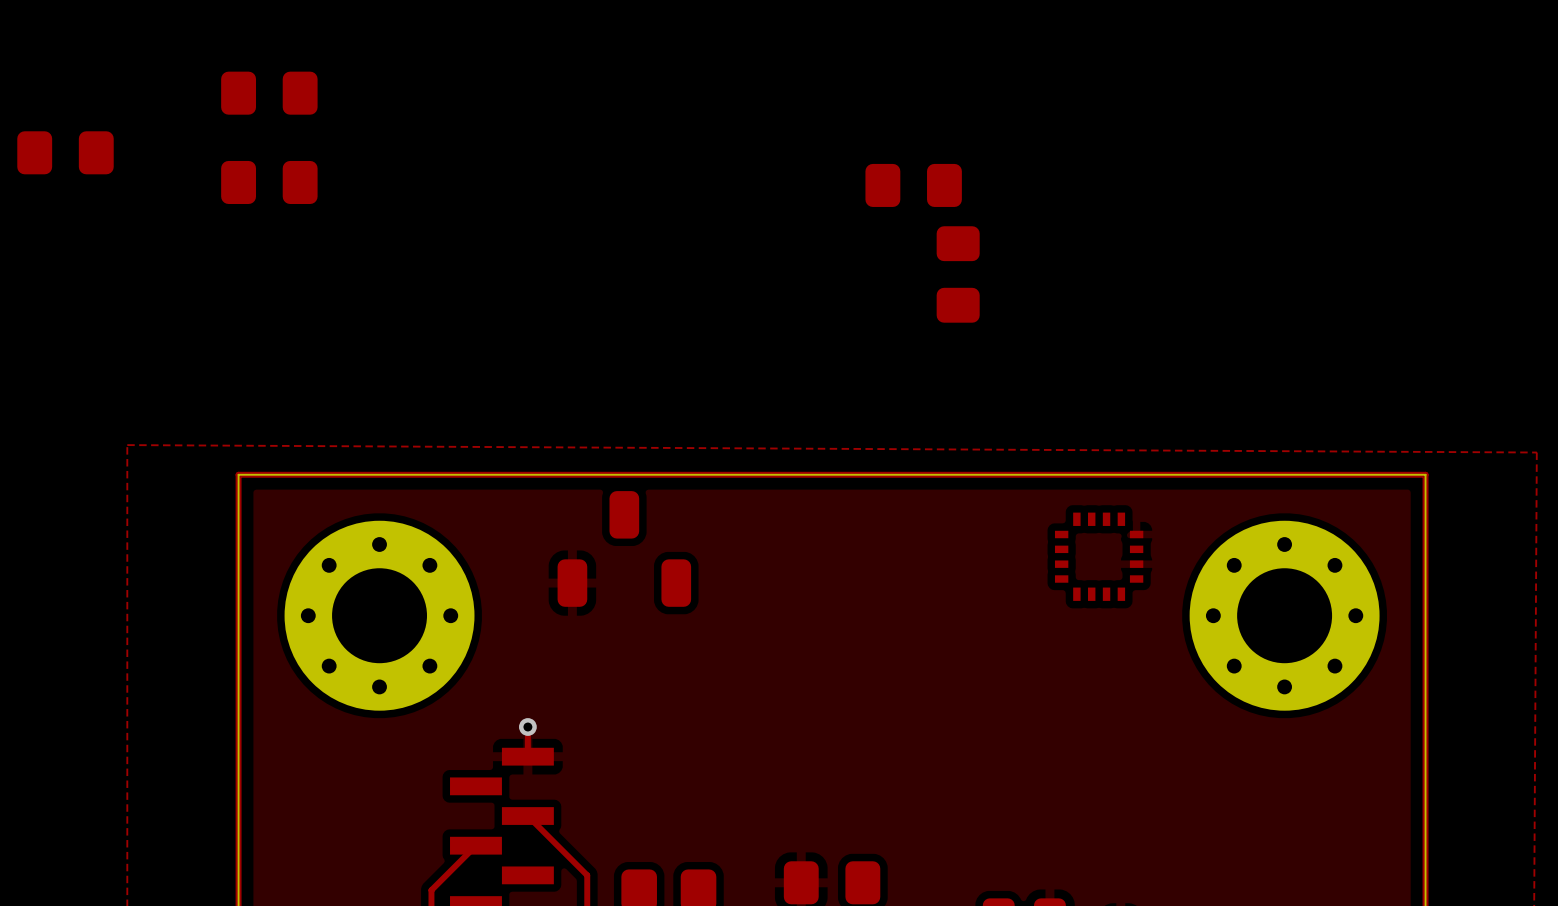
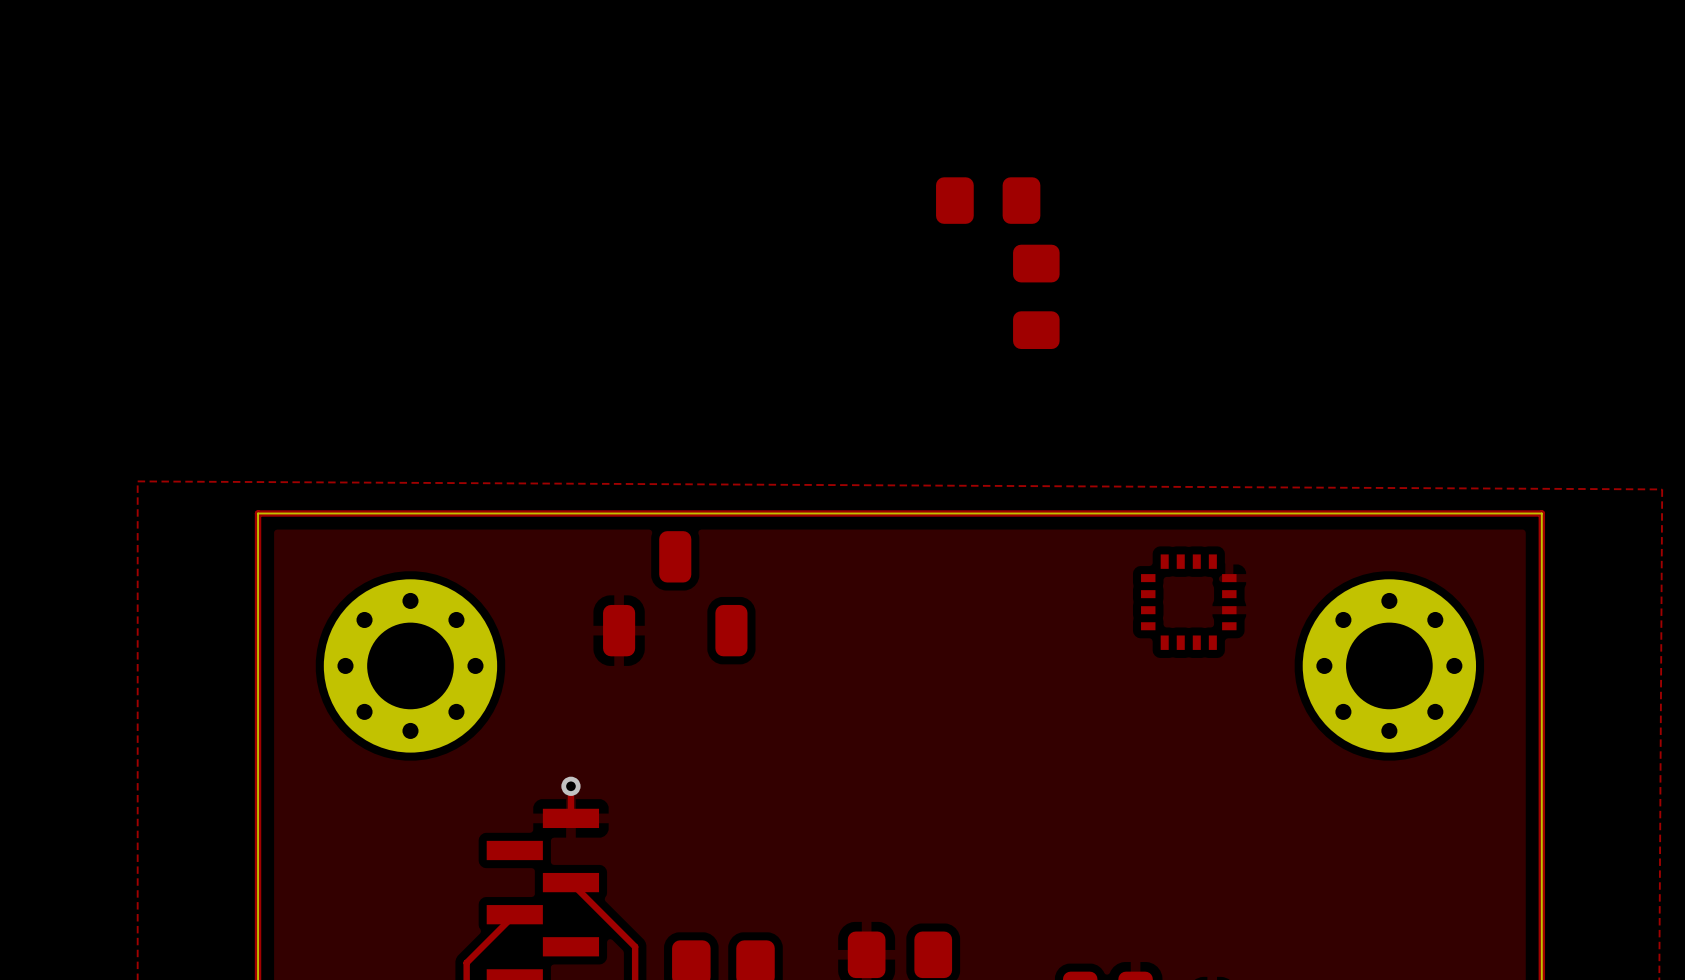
part: (269, 93) -> none
part: (65, 152) -> none
part: (269, 182) -> none
part footprint: [284, 520, 475, 711] -> [323, 579, 498, 753]
part footprint: [1189, 520, 1380, 711] -> [1302, 579, 1477, 753]

